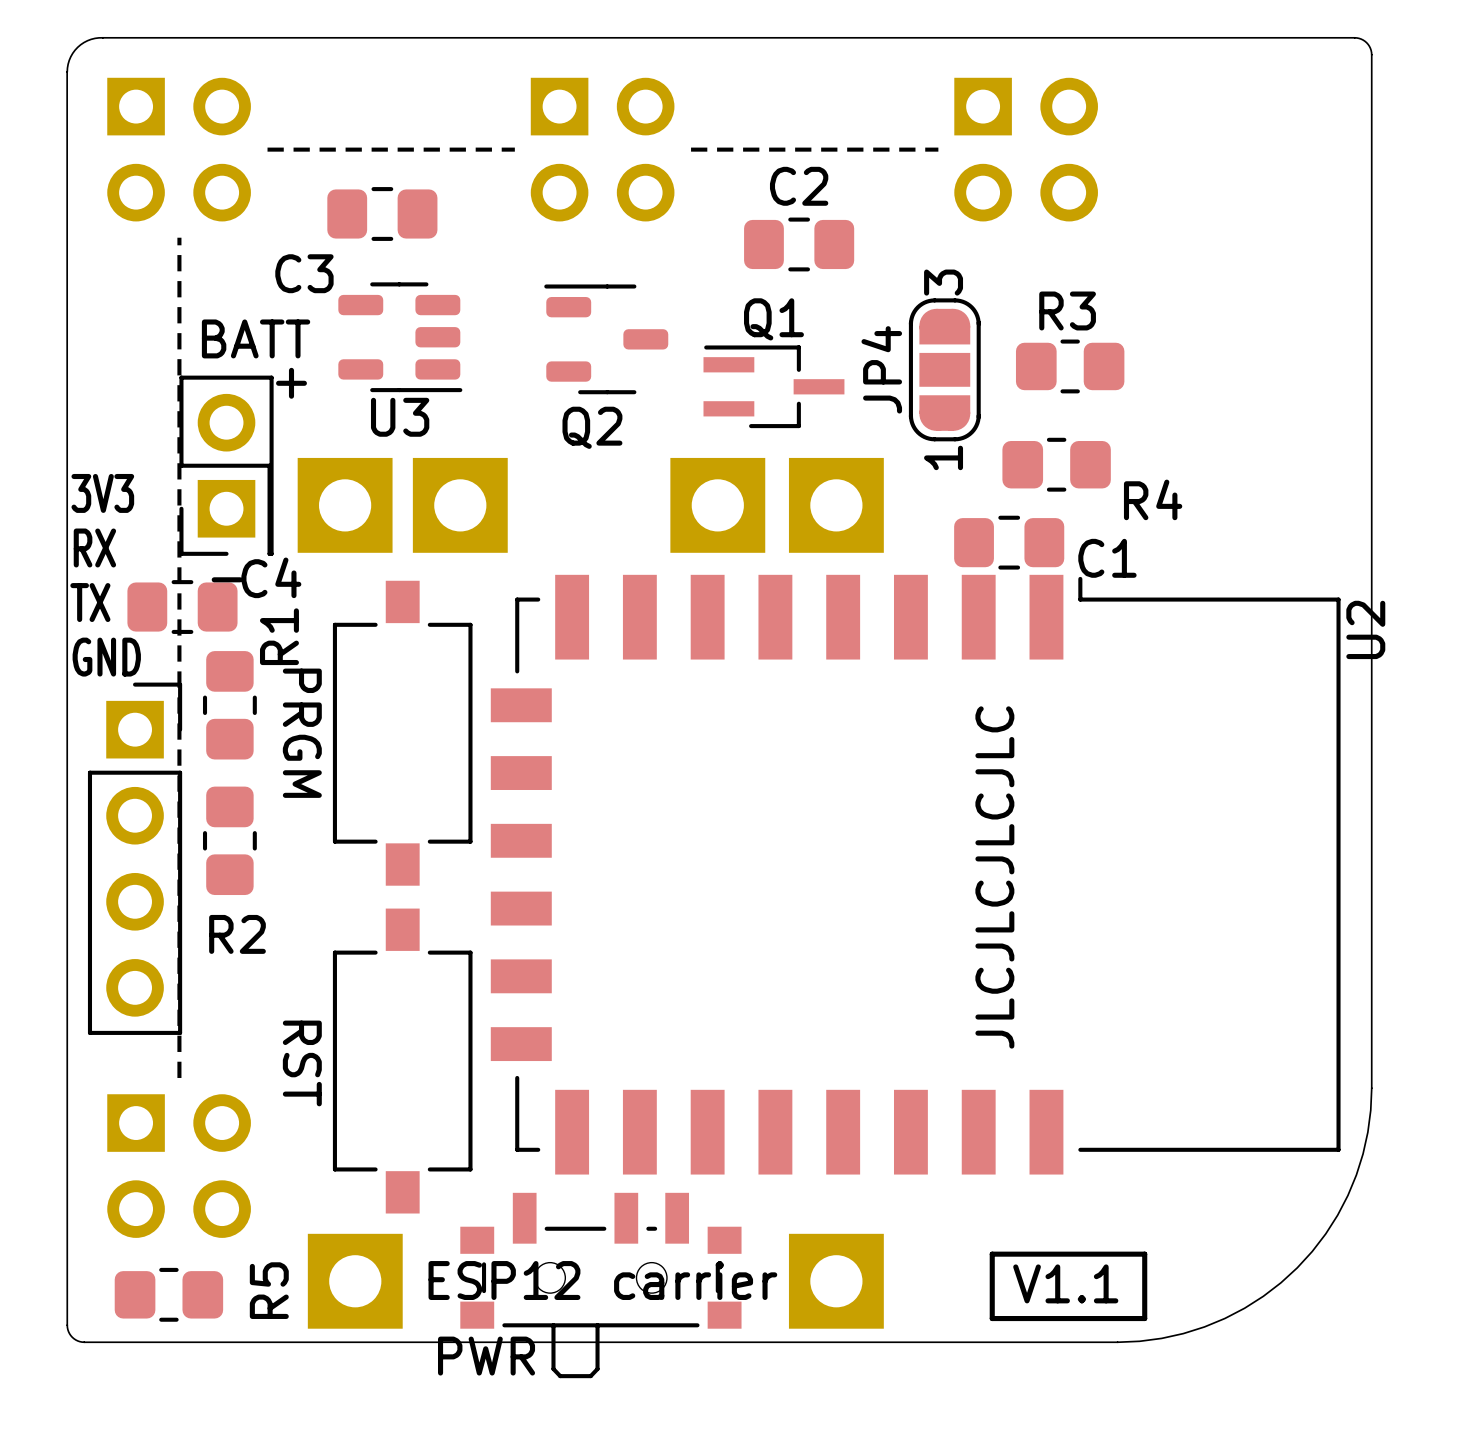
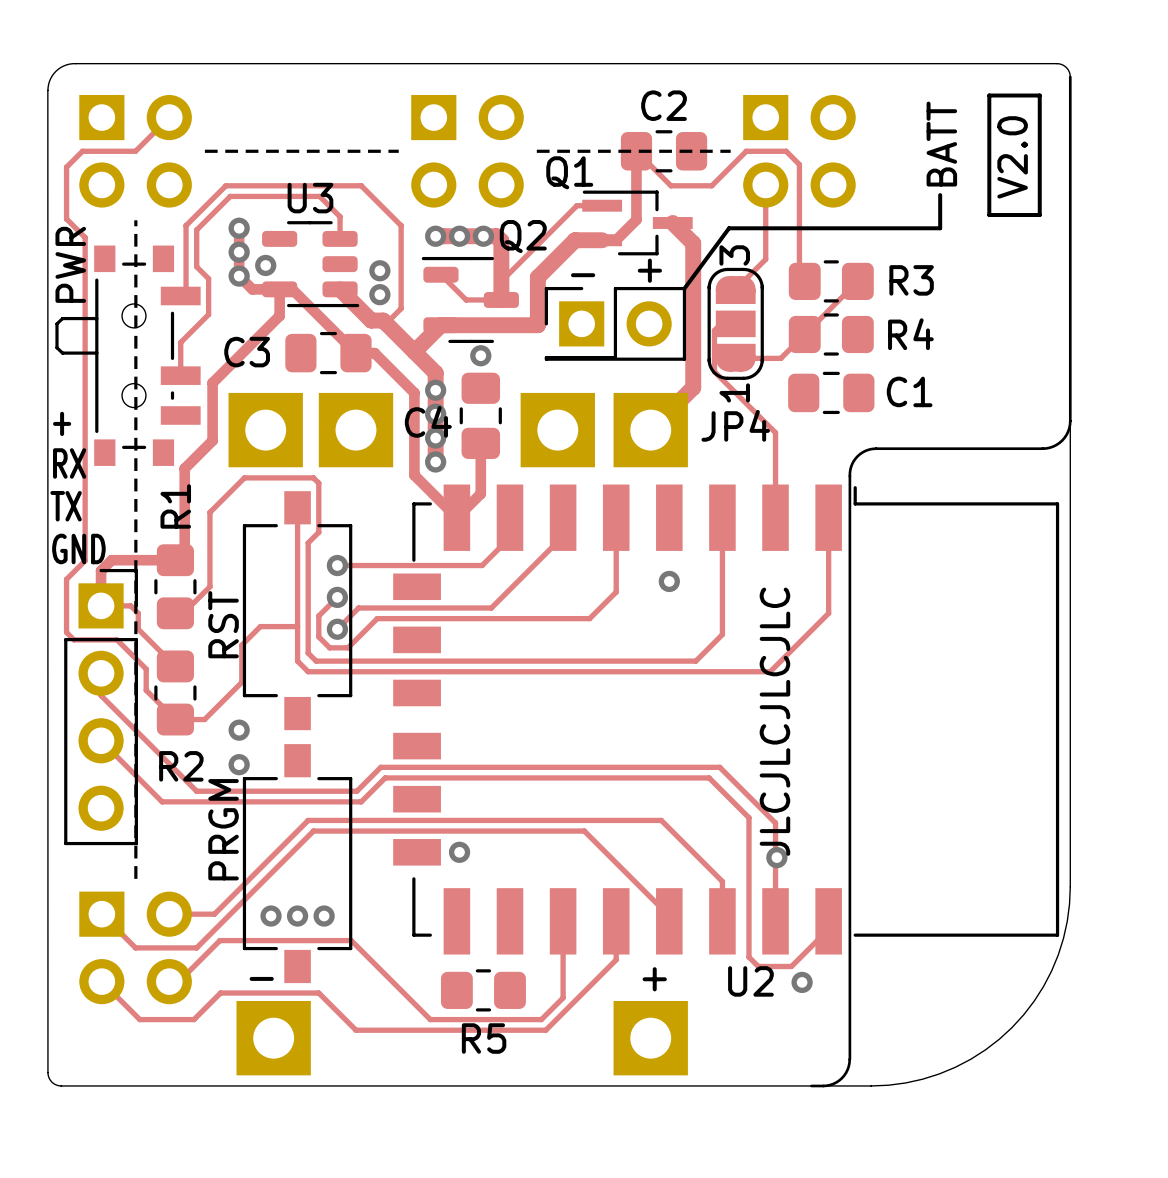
board edge: none -> (1070, 76) (1070, 421) (1066, 434) (1059, 442) (1046, 448) (873, 448) (864, 451) (857, 456) (850, 470) (849, 1059)
line: none -> (989, 95) (1039, 95) (1039, 215) (989, 215) (989, 95)
track: none -> (169, 117) (135, 151) (82, 151) (66, 167) (66, 218) (85, 237) (85, 560) (66, 579) (66, 632) (73, 639) (117, 639) (146, 669) (146, 690) (175, 719) (204, 719) (241, 682) (241, 645) (260, 626) (297, 626)
text: none -> V2.0 (1012, 157)
track: none -> (765, 185) (765, 259) (735, 289)
line: none -> (940, 195) (940, 228) (729, 228) (684, 288)
C3 position: (382, 213) -> (328, 353)
track: none -> (602, 205) (576, 205) (501, 281) (501, 299)
track: none -> (239, 222) (239, 276) (252, 289) (292, 289) (355, 353) (374, 353) (414, 392) (414, 475) (456, 517) (480, 493) (480, 443)
track: none -> (672, 222) (693, 243) (693, 387) (650, 430)
C2 position: (799, 244) -> (664, 151)
via: none -> (239, 228)
track: none -> (435, 236) (496, 236) (501, 240) (501, 299)
via: none -> (435, 236)
via: none -> (459, 236)
via: none -> (483, 236)
track: none -> (340, 238) (340, 216) (319, 196) (230, 196) (196, 230) (196, 266) (208, 278) (208, 314) (180, 342) (180, 375)
C3 name position: C3 (304, 273) -> C3 (247, 352)
via: none -> (239, 252)
via: none -> (265, 265)
text: none -> + (649, 270)
via: none -> (379, 270)
track: none -> (440, 274) (466, 299) (501, 299)
text: none -> - (583, 275)
via: none -> (239, 276)
R3 name position: R3 (1067, 310) -> R3 (911, 280)
track: none -> (804, 281) (799, 276) (799, 164) (786, 151) (746, 151) (711, 185) (670, 185) (636, 151) (636, 219) (616, 240) (575, 240) (537, 277) (537, 325) (440, 325) (414, 351)
track: none -> (857, 281) (780, 358) (746, 358)
Q1 name position: Q1 (773, 319) -> Q1 (569, 172)
track: none -> (279, 289) (279, 315) (212, 382) (212, 440) (184, 468) (184, 550) (175, 560) (111, 560) (101, 570) (101, 605) (130, 605) (138, 613) (138, 629) (175, 666)
track: none -> (330, 289) (340, 289) (371, 320) (383, 320) (435, 373) (435, 461)
via: none -> (379, 294)
track: none -> (180, 296) (186, 290) (186, 225) (225, 185) (361, 185) (401, 225) (401, 308) (386, 323)
U3 position: (400, 337) -> (310, 264)
part value position: BATT (256, 338) -> BATT (941, 144)
R3 position: (1070, 366) -> (831, 281)
JP4 name rotation: 0° (881, 369) -> 90° clockwise (735, 425)
JP4 name position: JP4 (881, 369) -> JP4 (735, 425)
track: none -> (746, 323) (721, 323) (714, 330) (714, 371) (775, 432) (775, 517)
text: + (291, 383) -> none
Q1 position: (773, 386) -> (637, 222)
part: none -> PWR (128, 355)
via: none -> (480, 355)
U3 name position: U3 (400, 417) -> U3 (310, 198)
Q2 name position: Q2 (592, 427) -> Q2 (523, 236)
via: none -> (435, 390)
R4 position: (1056, 464) -> (831, 334)
part rotation: 0° (226, 465) -> 90° clockwise (615, 323)
part position: (226, 465) -> (615, 323)
via: none -> (435, 414)
text: 3V3 (102, 493) -> + (62, 423)
R4 name position: R4 (1153, 499) -> R4 (910, 334)
via: none -> (435, 438)
C1 position: (1009, 542) -> (831, 392)
via: none -> (435, 461)
C1 name position: C1 (1107, 558) -> C1 (909, 391)
C4 name position: C4 (271, 577) -> C4 (428, 421)
text: - (227, 579) -> none
track: none -> (297, 507) (297, 661) (308, 671) (770, 671) (828, 613) (828, 517)
C4 rotation: 0° (182, 607) -> 90° clockwise (480, 415)
C4 position: (182, 607) -> (480, 415)
track: none -> (510, 517) (510, 537) (482, 565) (337, 565)
track: none -> (563, 517) (563, 536) (491, 608) (358, 608) (337, 629)
track: none -> (616, 517) (616, 592) (589, 618) (377, 618) (348, 647) (329, 647) (318, 636) (318, 615) (337, 597) (337, 602)
track: none -> (722, 517) (722, 634) (695, 661) (316, 661) (308, 653) (308, 542) (318, 532) (318, 483) (313, 477) (244, 477) (209, 512) (209, 586) (183, 613) (175, 613)
U2 name rotation: 0° (1365, 629) -> 90° clockwise (750, 981)
U2 name position: U2 (1365, 629) -> U2 (750, 981)
R1 name position: R1 (279, 636) -> R1 (175, 506)
via: none -> (337, 565)
via: none -> (669, 581)
via: none -> (337, 597)
part value: PRGM (302, 733) -> RST (223, 624)
part position: (402, 733) -> (297, 610)
via: none -> (337, 629)
track: none -> (101, 673) (101, 695) (196, 791) (356, 791) (380, 767) (719, 767) (775, 823) (775, 921)
U2 position: (915, 874) -> (726, 719)
via: none -> (239, 730)
track: none -> (101, 740) (162, 801) (361, 801) (385, 777) (709, 777) (748, 817) (748, 957) (758, 966) (791, 966) (828, 929) (828, 921)
via: none -> (239, 764)
via: none -> (459, 852)
via: none -> (776, 857)
part position: (402, 1061) -> (297, 863)
part value: RST (302, 1063) -> PRGM (223, 829)
track: none -> (101, 914) (135, 947) (196, 947) (313, 831) (584, 831) (669, 916) (669, 921)
track: none -> (169, 914) (214, 914) (308, 820) (661, 820) (722, 881) (722, 921)
via: none -> (271, 916)
via: none -> (297, 916)
via: none -> (324, 916)
track: none -> (563, 921) (563, 997) (541, 1019) (430, 1019) (351, 940) (219, 940) (178, 981) (169, 981)
track: none -> (616, 921) (616, 959) (545, 1030) (355, 1030) (318, 993) (220, 993) (194, 1019) (139, 1019) (101, 981)
text: none -> - (261, 978)
text: none -> + (654, 979)
via: none -> (802, 982)
line: (992, 1254) (1144, 1254) (1144, 1318) (992, 1318) (992, 1254) -> none
text: ESP12 carrier (602, 1280) -> none
text: V1.1 (1065, 1283) -> none
part: PWR (600, 1285) -> none
R5 name rotation: 0° (269, 1290) -> 90° clockwise (484, 1038)
R5 name position: R5 (269, 1290) -> R5 (484, 1038)
R5 position: (168, 1294) -> (483, 990)
board edge: none -> (849, 1059) (847, 1069) (839, 1080) (826, 1085) (811, 1085)

